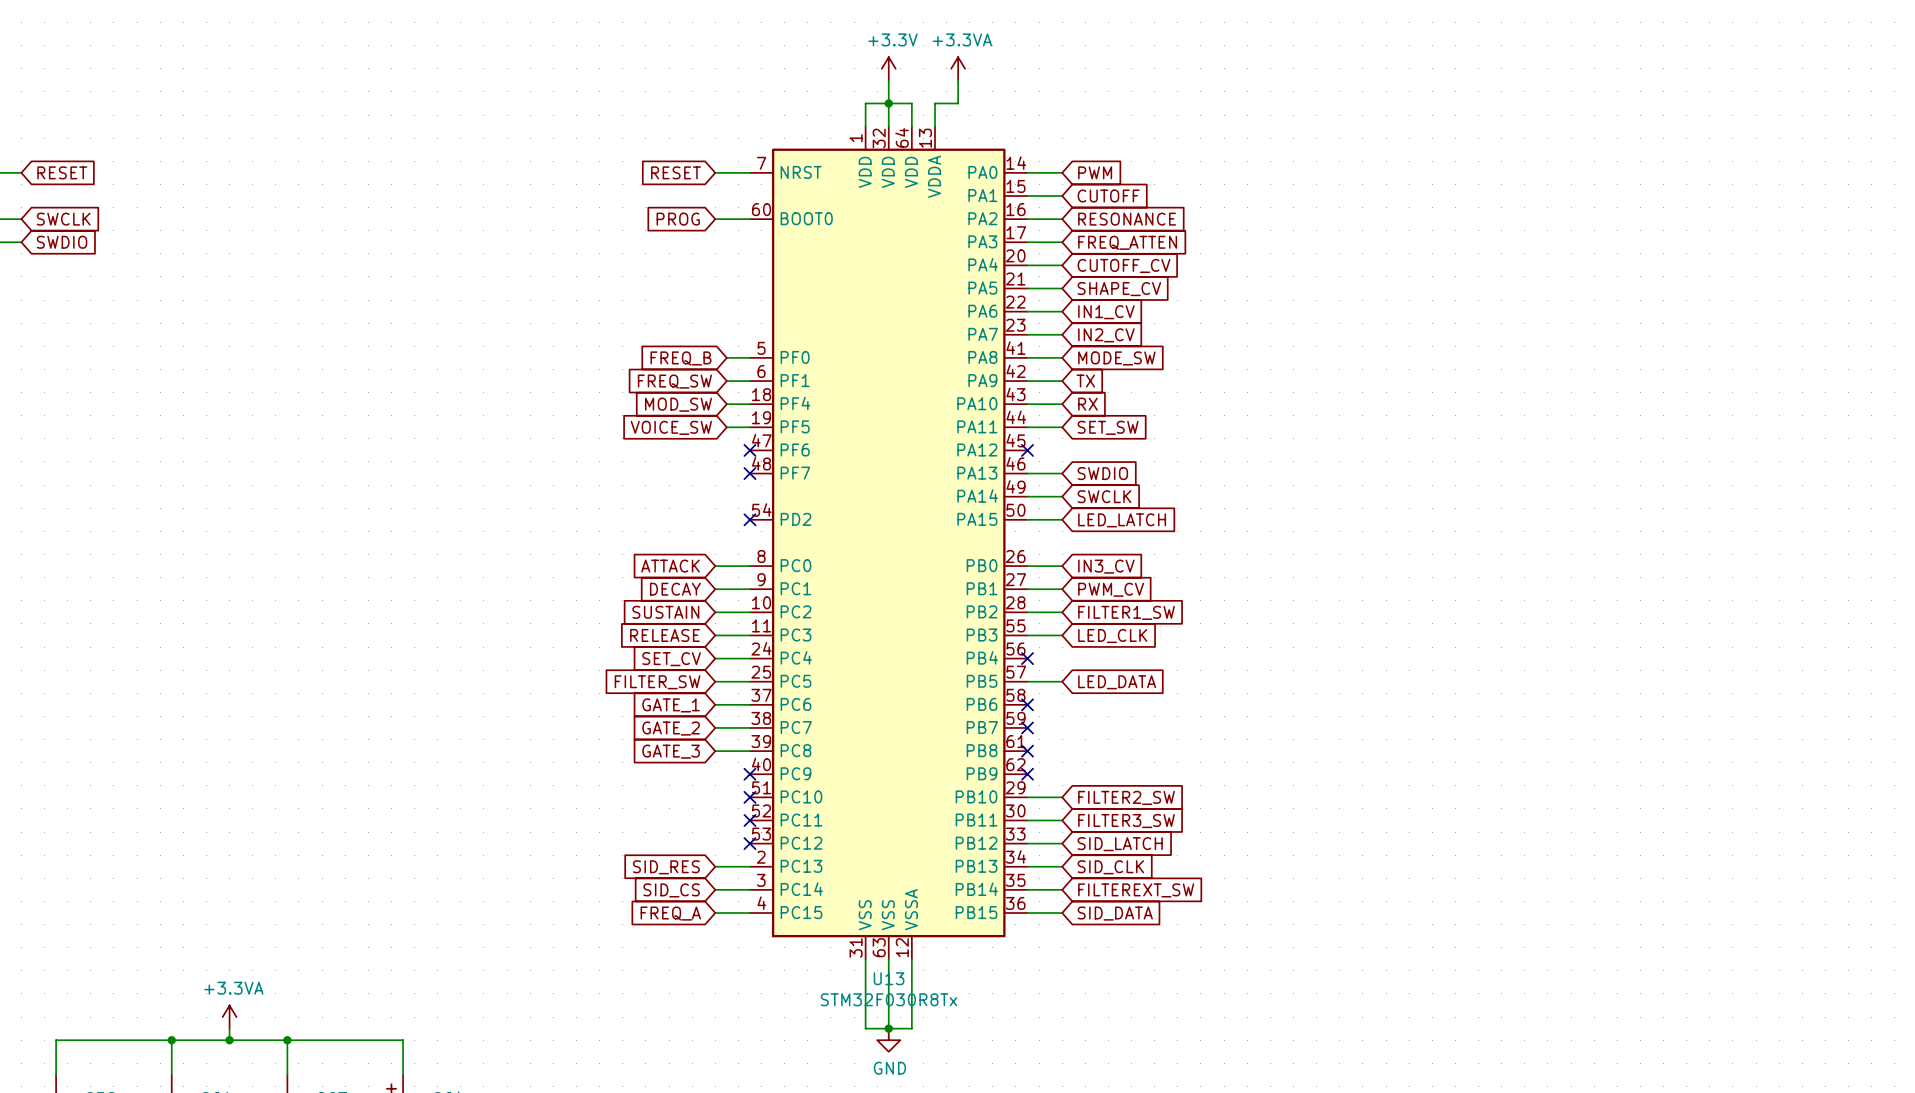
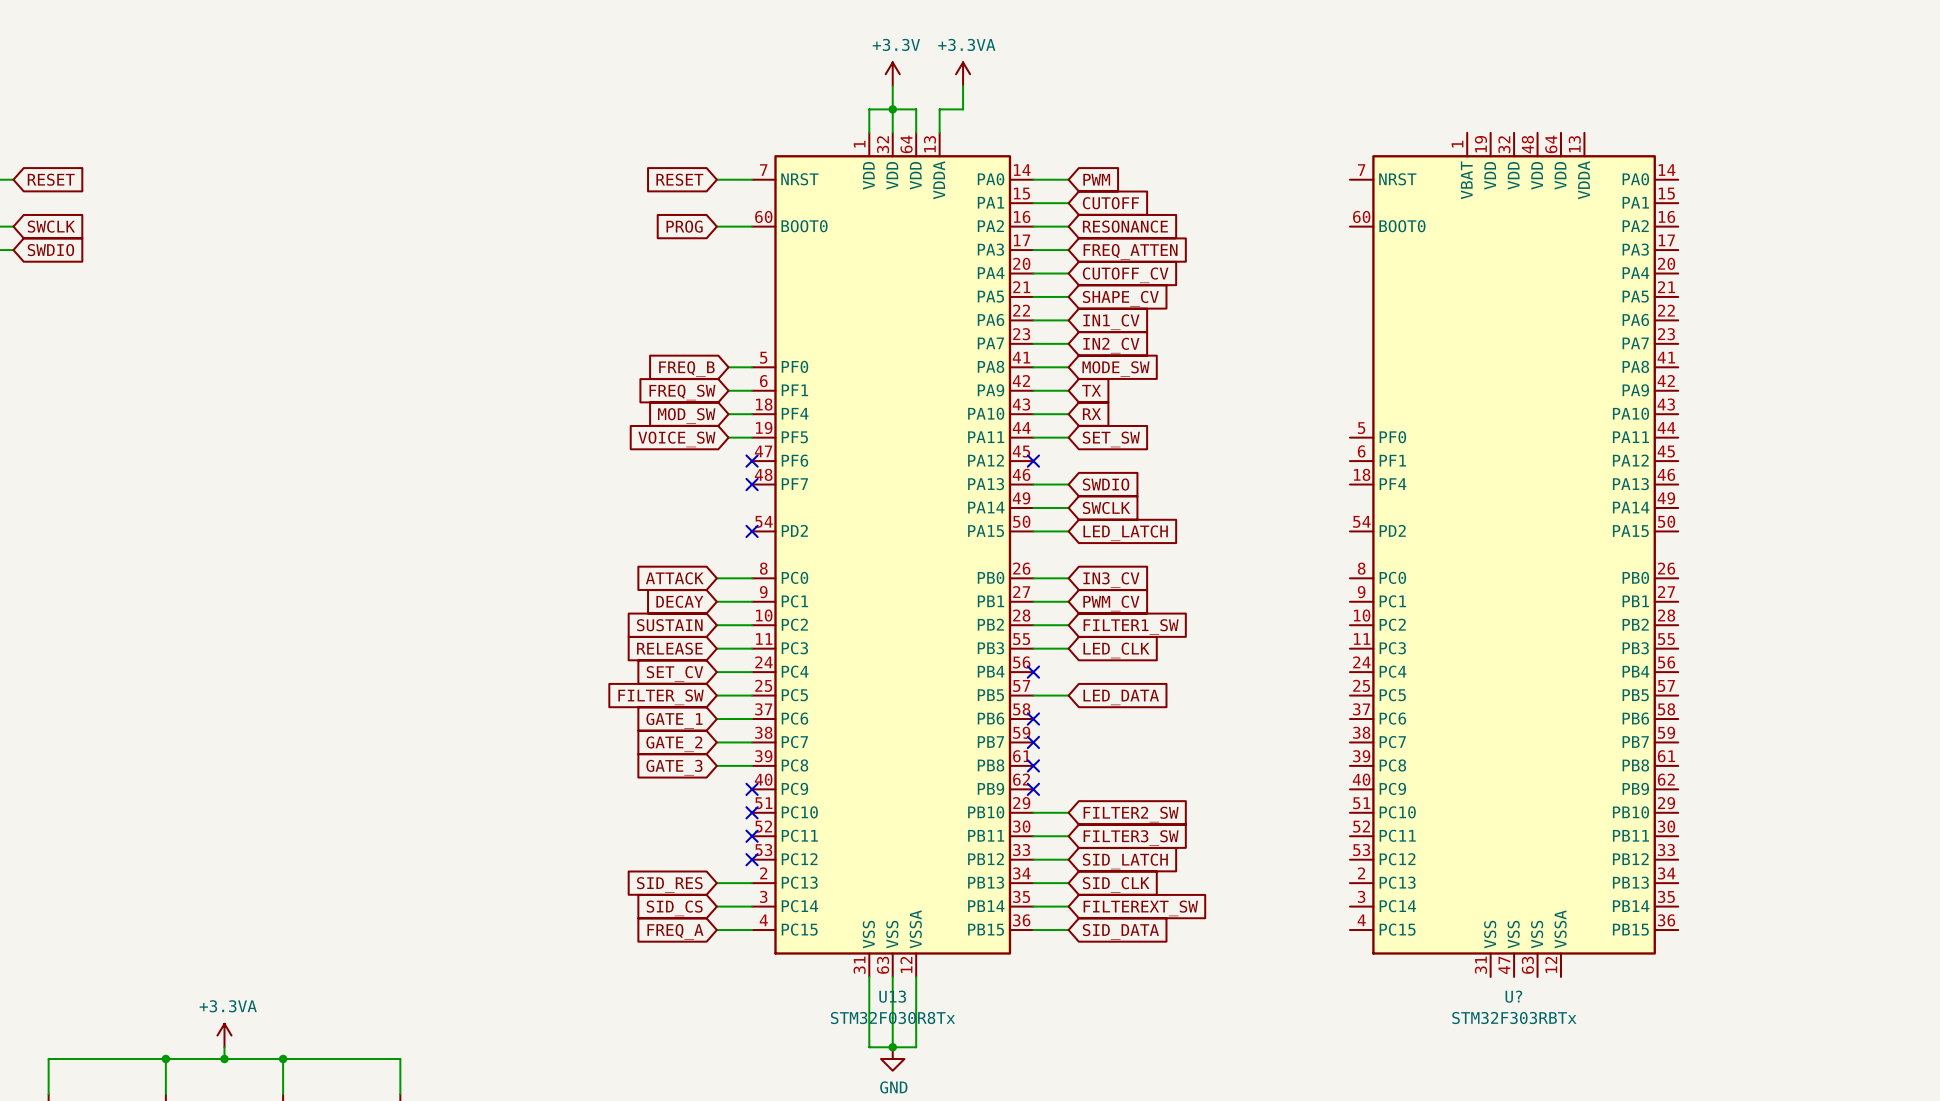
U?: none -> STM32F303RBTx (1514, 554)

